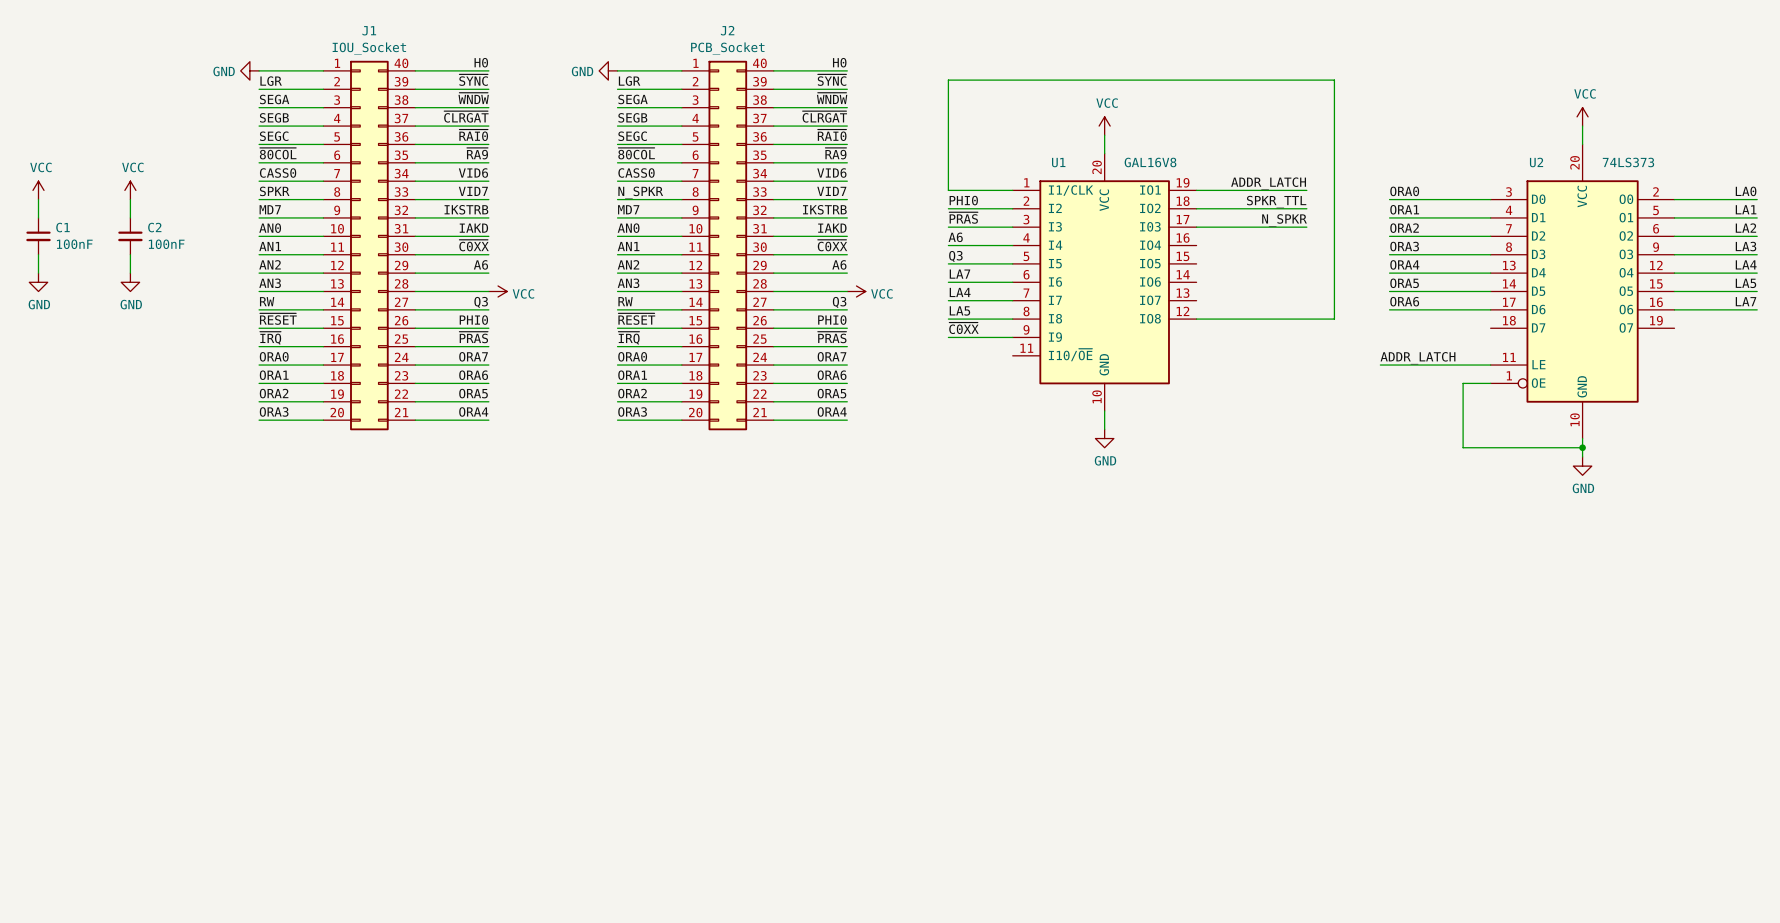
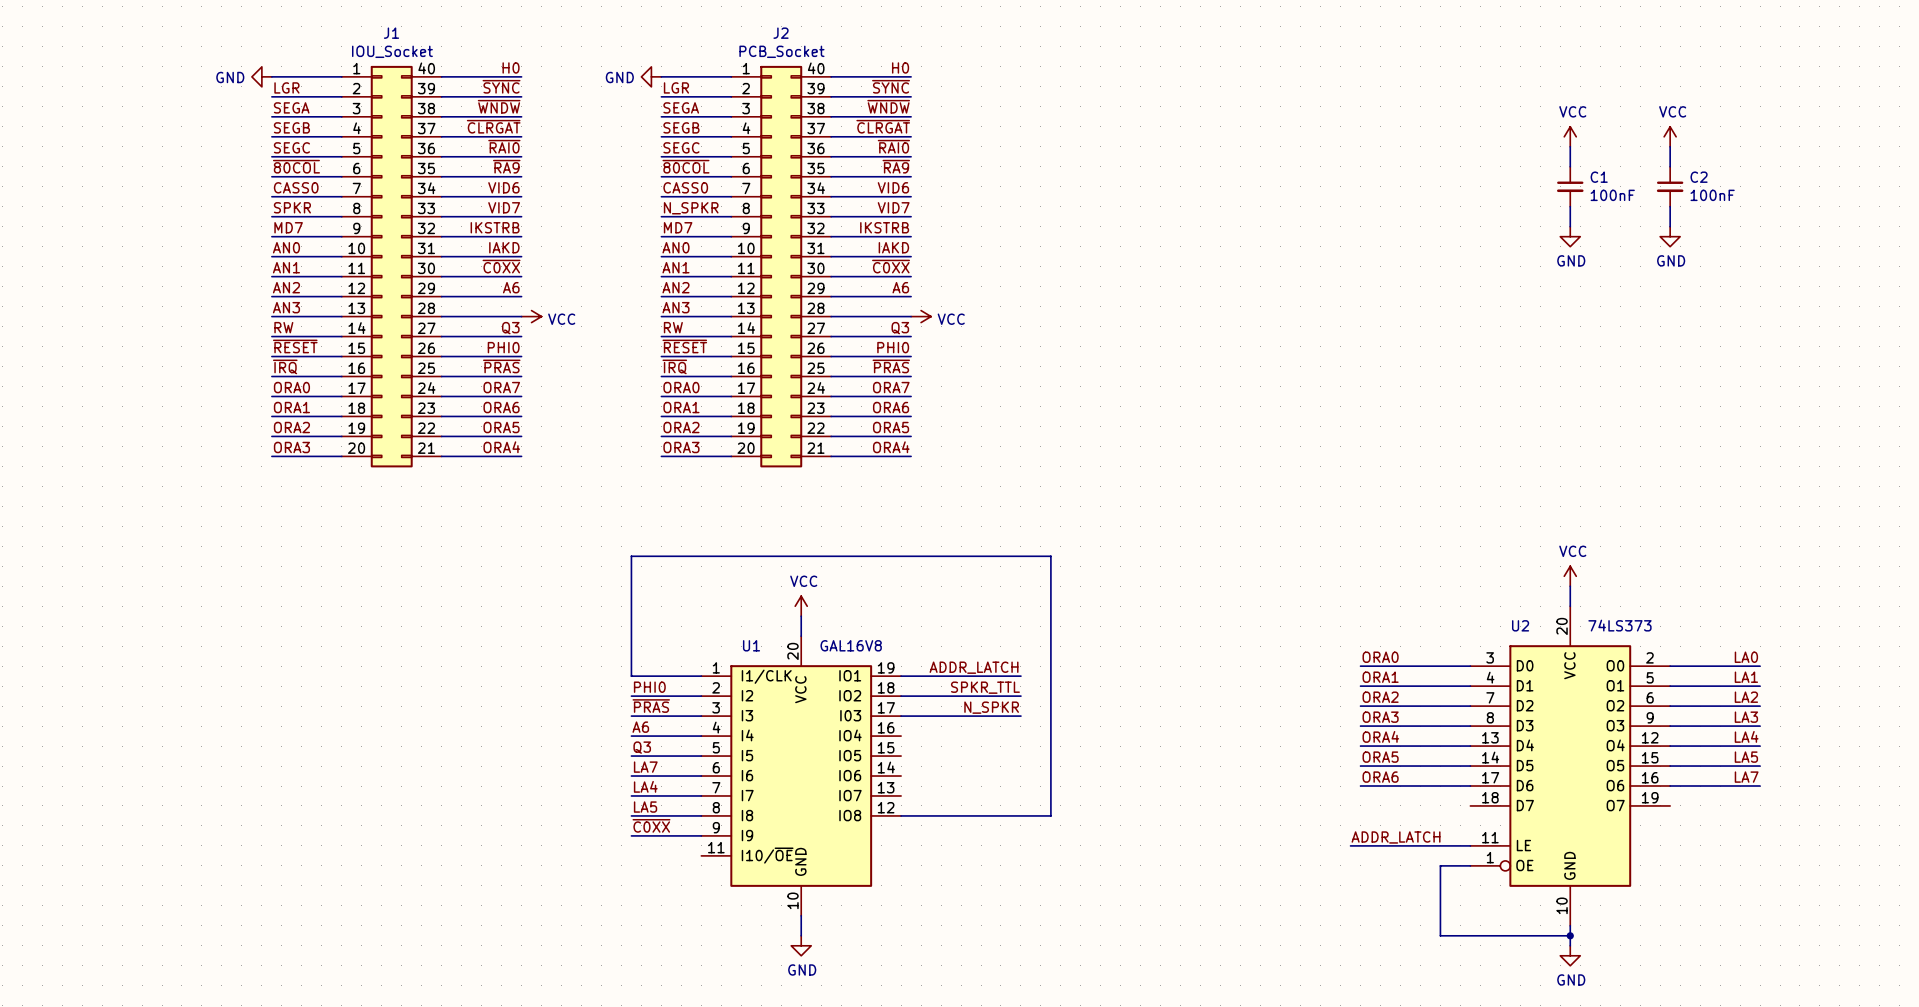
power symbol position: VCC (1582, 116) -> VCC (1670, 136)
power symbol: VCC (1104, 126) -> none
power symbol: none -> VCC (1570, 136)
wire: (1582, 126) (1582, 144) -> (1670, 146) (1670, 166)
wire: (1104, 135) (1104, 153) -> none
wire: none -> (1570, 146) (1570, 166)
label: ADDR_LATCH (1268, 183) -> none
power symbol: VCC (38, 190) -> none
power symbol: VCC (130, 190) -> none
wire: (1012, 190) (948, 190) (948, 80) (1334, 80) (1334, 319) (1196, 319) -> none
wire: (1196, 190) (1306, 190) -> none
wire: none -> (1570, 206) (1570, 226)
label: ORA0 (1404, 191) -> none
label: LA0 (1746, 191) -> none
wire: (38, 199) (38, 217) -> none
wire: (130, 199) (130, 217) -> none
wire: (1389, 199) (1490, 199) -> none
wire: (1674, 199) (1757, 199) -> none
label: PHI0 (963, 200) -> none
label: SPKR_TTL (1276, 201) -> none
wire: (948, 208) (1012, 208) -> none
wire: (1196, 208) (1306, 208) -> none
label: ORA1 (1404, 209) -> none
label: LA1 (1746, 209) -> none
label: ~{PRAS} (963, 217) -> none
wire: (1389, 217) (1490, 217) -> none
power symbol: none -> GND (1570, 236)
power symbol: none -> GND (1670, 236)
wire: (1674, 217) (1757, 217) -> none
label: N_SPKR (1284, 220) -> none
wire: (948, 227) (1012, 227) -> none
wire: (1196, 227) (1306, 227) -> none
label: ORA2 (1404, 228) -> none
label: LA2 (1745, 228) -> none
C1 position: (38, 236) -> (1570, 186)
C2 position: (130, 236) -> (1670, 186)
wire: (1389, 236) (1490, 236) -> none
wire: (1674, 236) (1757, 236) -> none
label: A6 (955, 237) -> none
wire: (948, 245) (1012, 245) -> none
label: ORA3 (1404, 246) -> none
label: LA3 (1746, 246) -> none
wire: (38, 254) (38, 273) -> none
wire: (130, 254) (130, 273) -> none
wire: (1389, 254) (1490, 254) -> none
wire: (1674, 254) (1757, 254) -> none
label: Q3 (955, 256) -> none
wire: (948, 263) (1012, 263) -> none
label: ORA4 (1404, 264) -> none
label: LA4 (1746, 264) -> none
wire: (1389, 273) (1490, 273) -> none
wire: (1674, 273) (1757, 273) -> none
label: LA7 (959, 274) -> none
power symbol: GND (38, 282) -> none
power symbol: GND (130, 282) -> none
wire: (948, 282) (1012, 282) -> none
U1 position: (1104, 282) -> (801, 776)
label: ORA5 (1404, 283) -> none
label: LA5 (1745, 283) -> none
wire: (1389, 291) (1490, 291) -> none
U2 position: (1582, 291) -> (1570, 766)
wire: (1674, 291) (1757, 291) -> none
label: LA4 (960, 292) -> none
wire: (948, 300) (1012, 300) -> none
label: ORA6 (1404, 301) -> none
label: LA7 (1746, 301) -> none
wire: (1389, 309) (1490, 309) -> none
wire: (1674, 309) (1757, 309) -> none
label: LA5 (959, 310) -> none
wire: (948, 319) (1012, 319) -> none
label: ~{C0XX} (963, 328) -> none
wire: (948, 337) (1012, 337) -> none
label: ADDR_LATCH (1418, 358) -> none
wire: (1380, 365) (1490, 365) -> none
wire: (1490, 383) (1463, 383) (1463, 447) (1582, 447) -> none
wire: (1104, 410) (1104, 429) -> none
power symbol: GND (1104, 438) -> none
wire: (1582, 438) (1582, 456) -> (1570, 586) (1570, 606)
junction: (1582, 447) -> none
power symbol: GND (1582, 466) -> none
power symbol: none -> VCC (1570, 576)
power symbol: none -> VCC (801, 606)
wire: none -> (801, 616) (801, 636)
label: none -> ORA0 (1380, 657)
label: none -> LA0 (1746, 657)
wire: none -> (1360, 666) (1470, 666)
wire: none -> (1670, 666) (1760, 666)
label: none -> ADDR_LATCH (974, 667)
wire: none -> (701, 676) (631, 676) (631, 556) (1050, 556) (1050, 815) (901, 815)
wire: none -> (901, 676) (1020, 676)
label: none -> ORA1 (1380, 677)
label: none -> LA1 (1746, 677)
wire: none -> (1360, 686) (1470, 686)
wire: none -> (1670, 686) (1760, 686)
label: none -> PHI0 (649, 687)
label: none -> SPKR_TTL (985, 687)
wire: none -> (631, 696) (701, 696)
wire: none -> (901, 696) (1020, 696)
label: none -> ORA2 (1380, 697)
label: none -> LA2 (1746, 697)
label: none -> ~{PRAS} (651, 706)
wire: none -> (1360, 706) (1470, 706)
wire: none -> (1670, 706) (1760, 706)
label: none -> N_SPKR (991, 707)
wire: none -> (631, 716) (701, 716)
wire: none -> (901, 716) (1020, 716)
label: none -> ORA3 (1380, 717)
label: none -> LA3 (1746, 717)
wire: none -> (1360, 726) (1470, 726)
wire: none -> (1670, 726) (1760, 726)
label: none -> A6 (640, 727)
wire: none -> (631, 736) (701, 736)
label: none -> ORA4 (1380, 736)
label: none -> LA4 (1746, 736)
wire: none -> (1360, 746) (1470, 746)
wire: none -> (1670, 746) (1760, 746)
label: none -> Q3 (642, 747)
wire: none -> (631, 756) (701, 756)
label: none -> ORA5 (1380, 757)
label: none -> LA5 (1746, 757)
wire: none -> (1360, 766) (1470, 766)
wire: none -> (1670, 766) (1760, 766)
label: none -> LA7 (645, 767)
wire: none -> (631, 776) (701, 776)
label: none -> ORA6 (1380, 777)
label: none -> LA7 (1746, 777)
wire: none -> (1360, 786) (1470, 786)
wire: none -> (1670, 786) (1760, 786)
label: none -> LA4 (645, 786)
wire: none -> (631, 795) (701, 795)
label: none -> LA5 (645, 807)
wire: none -> (631, 815) (701, 815)
label: none -> ~{C0XX} (651, 825)
wire: none -> (631, 835) (701, 835)
label: none -> ADDR_LATCH (1396, 837)
wire: none -> (1350, 845) (1470, 845)
wire: none -> (1470, 865) (1440, 865) (1440, 935) (1570, 935)
wire: none -> (801, 915) (801, 935)
wire: none -> (1570, 925) (1570, 945)
junction: none -> (1570, 935)
power symbol: none -> GND (801, 945)
power symbol: none -> GND (1570, 955)

